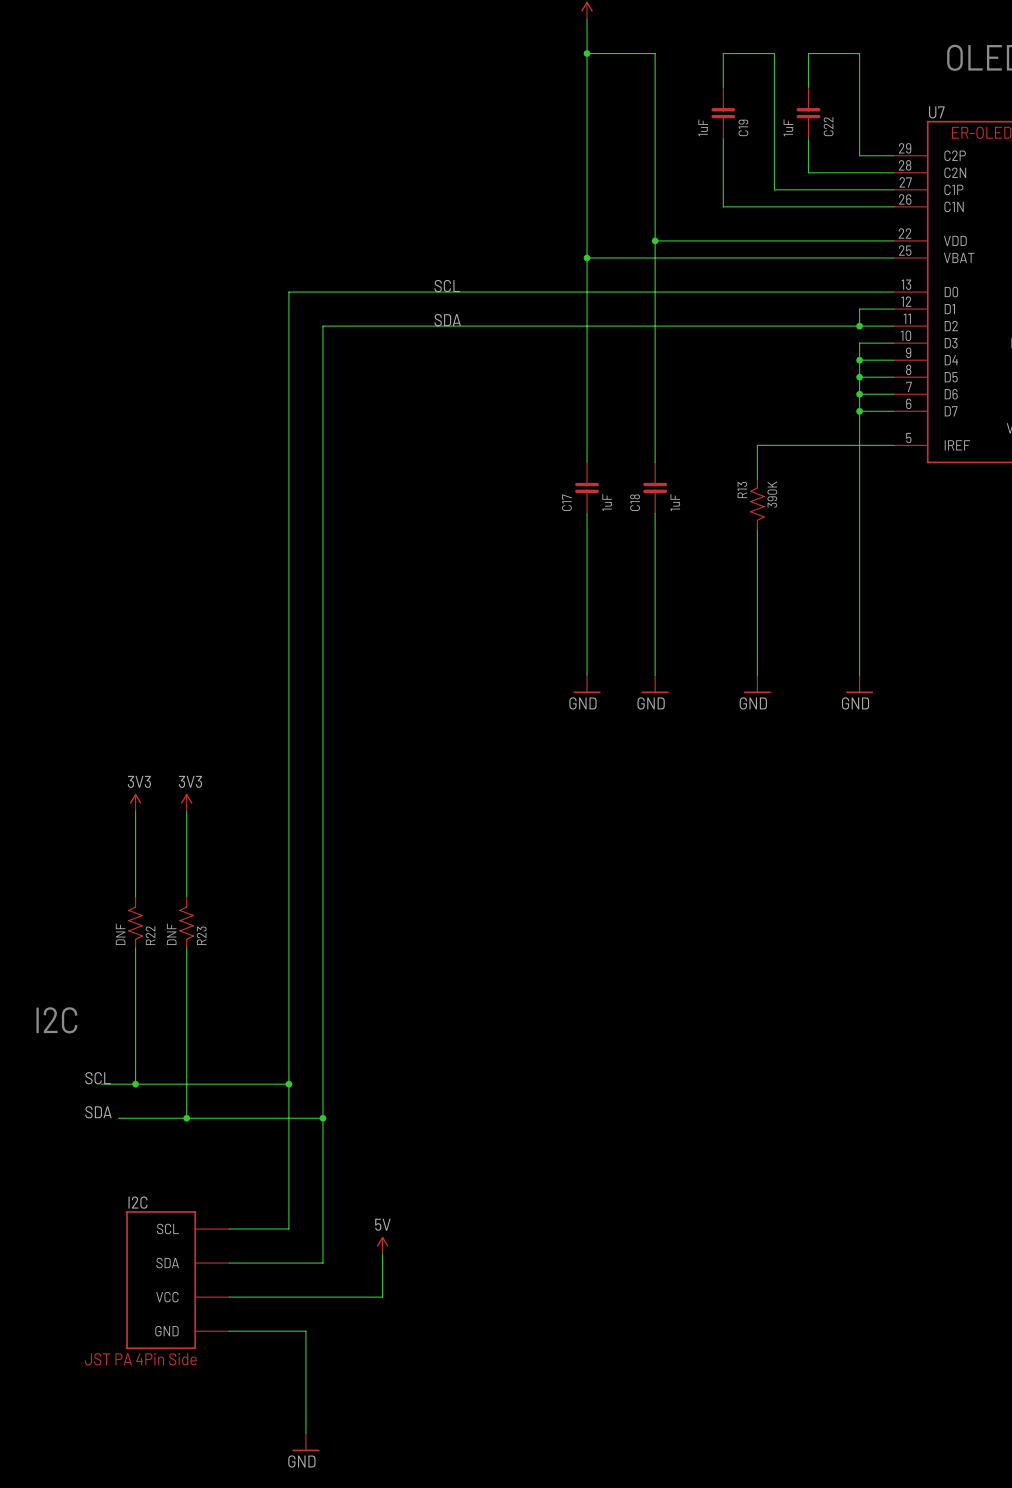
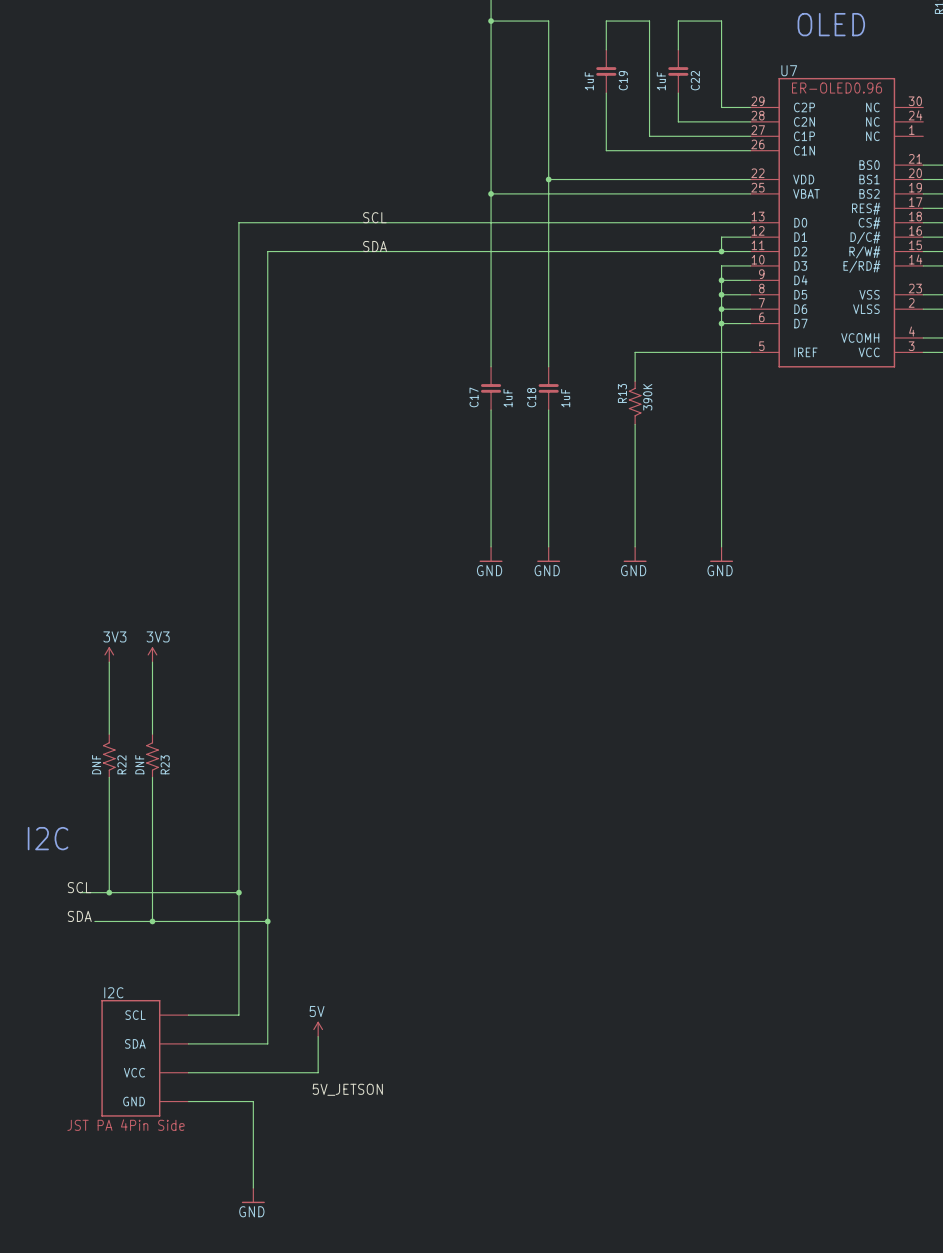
label: none -> 5V_JETSON (347, 1089)

